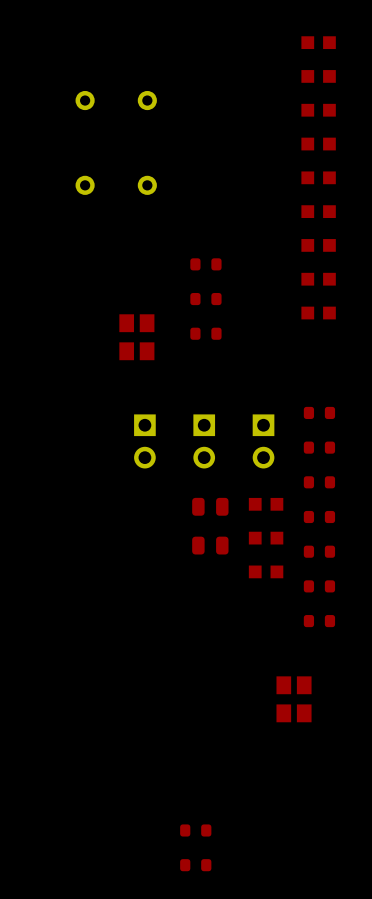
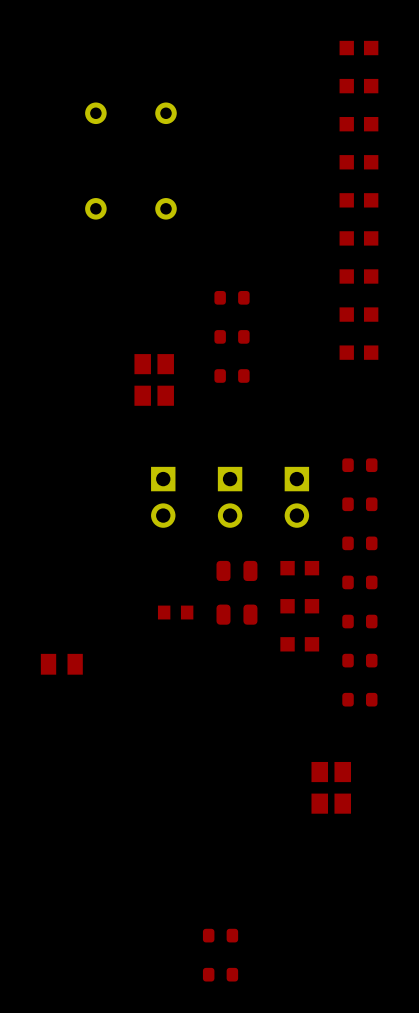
part: none -> (175, 612)
part: none -> (61, 664)

